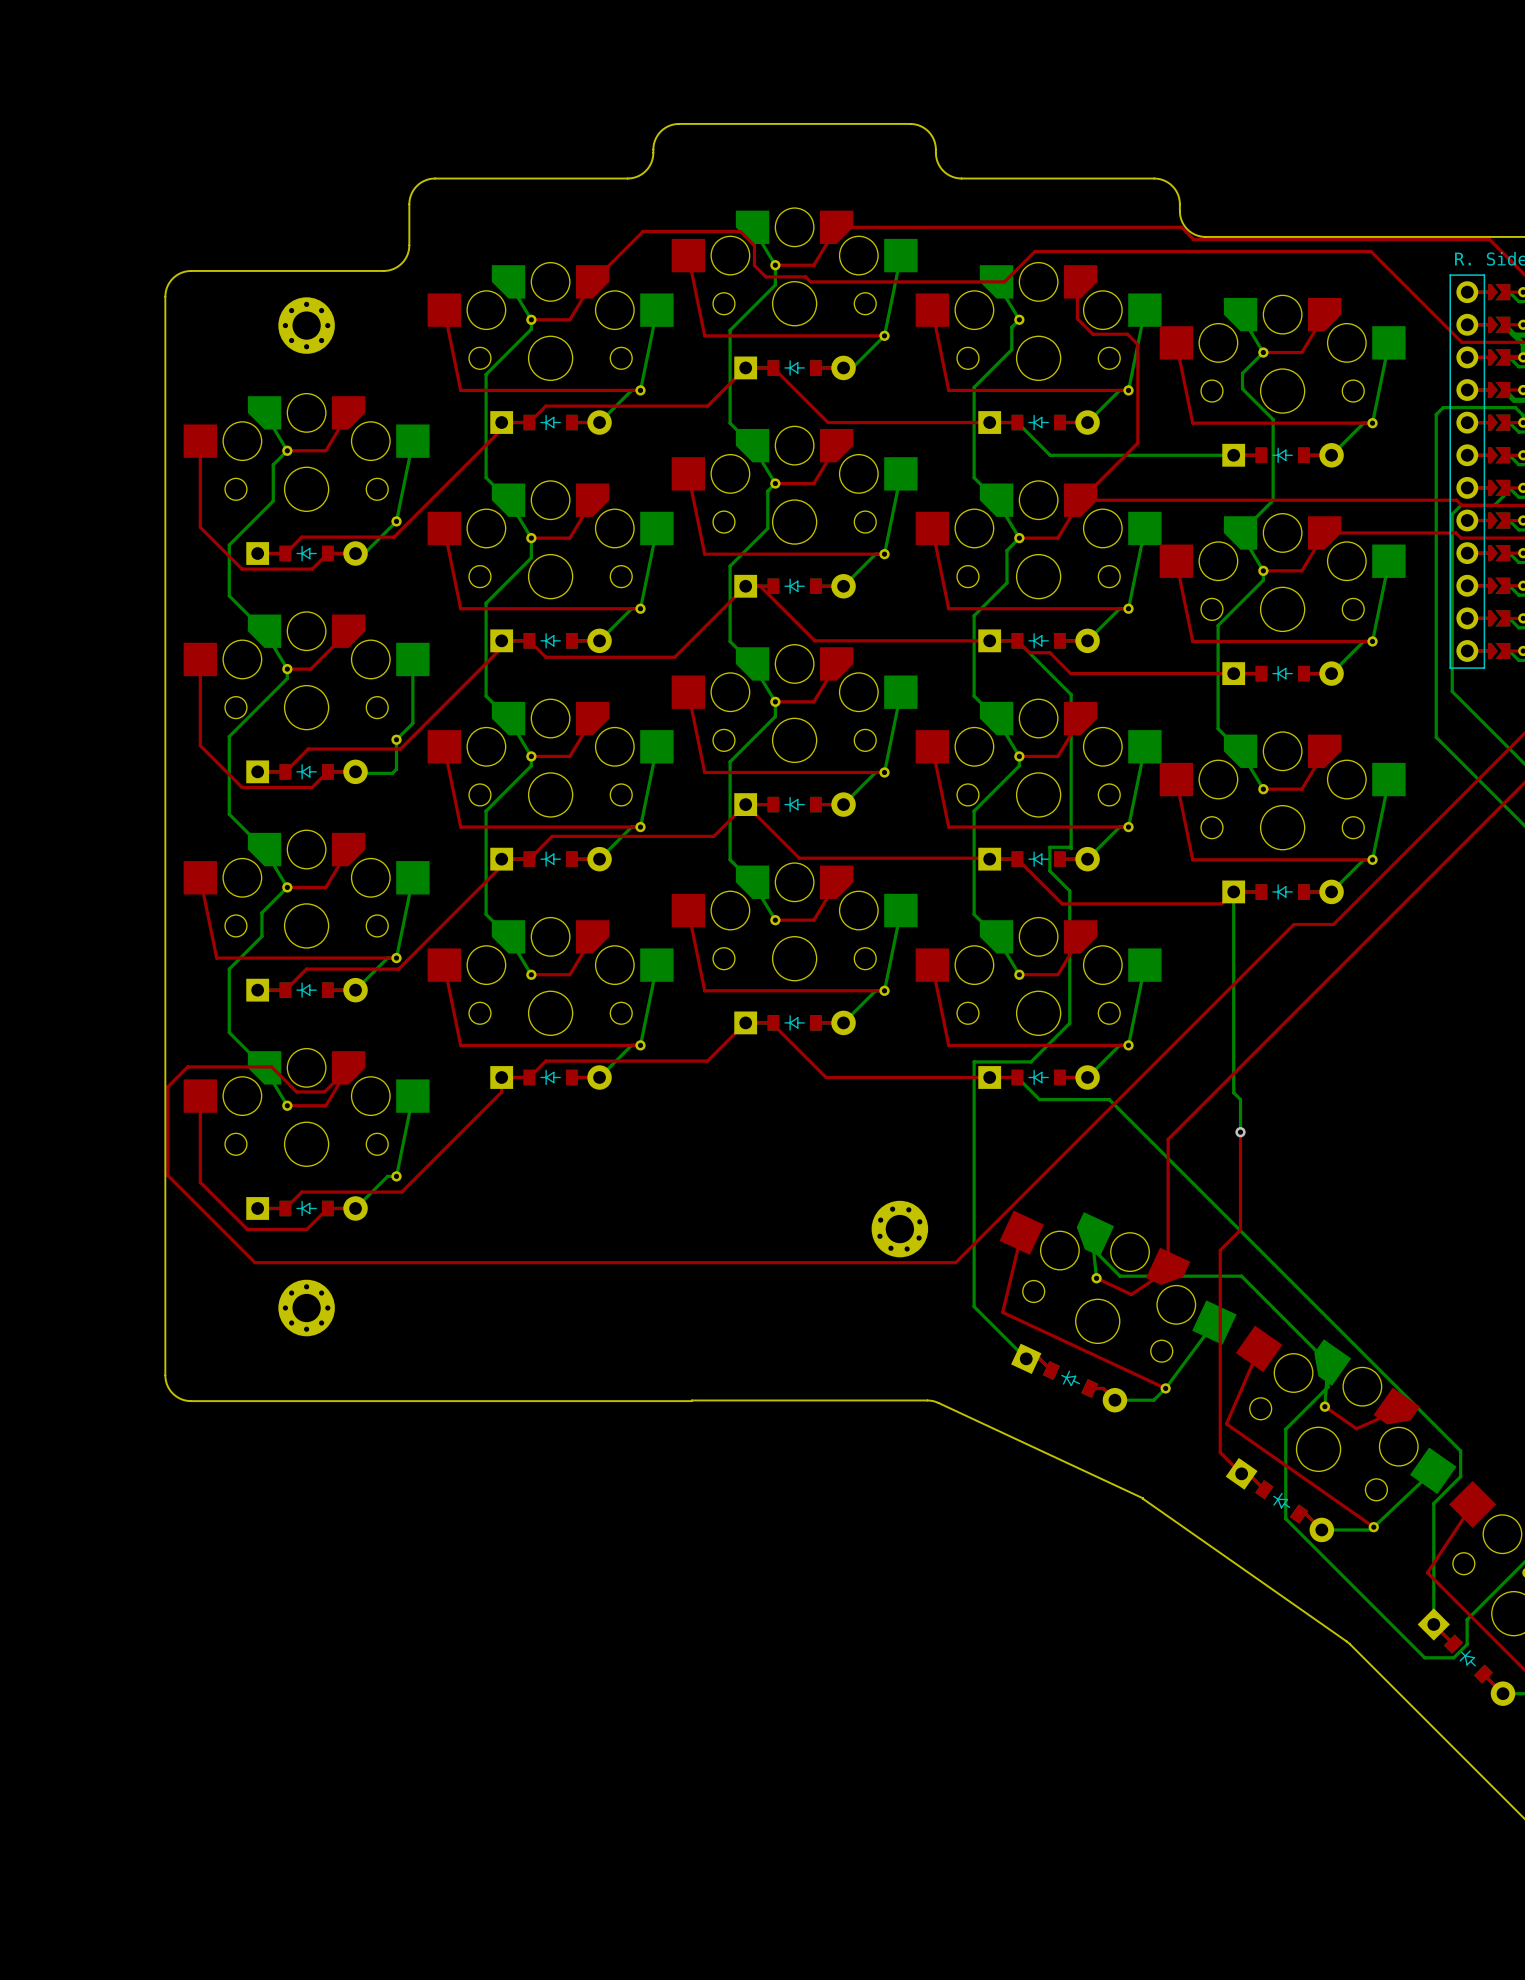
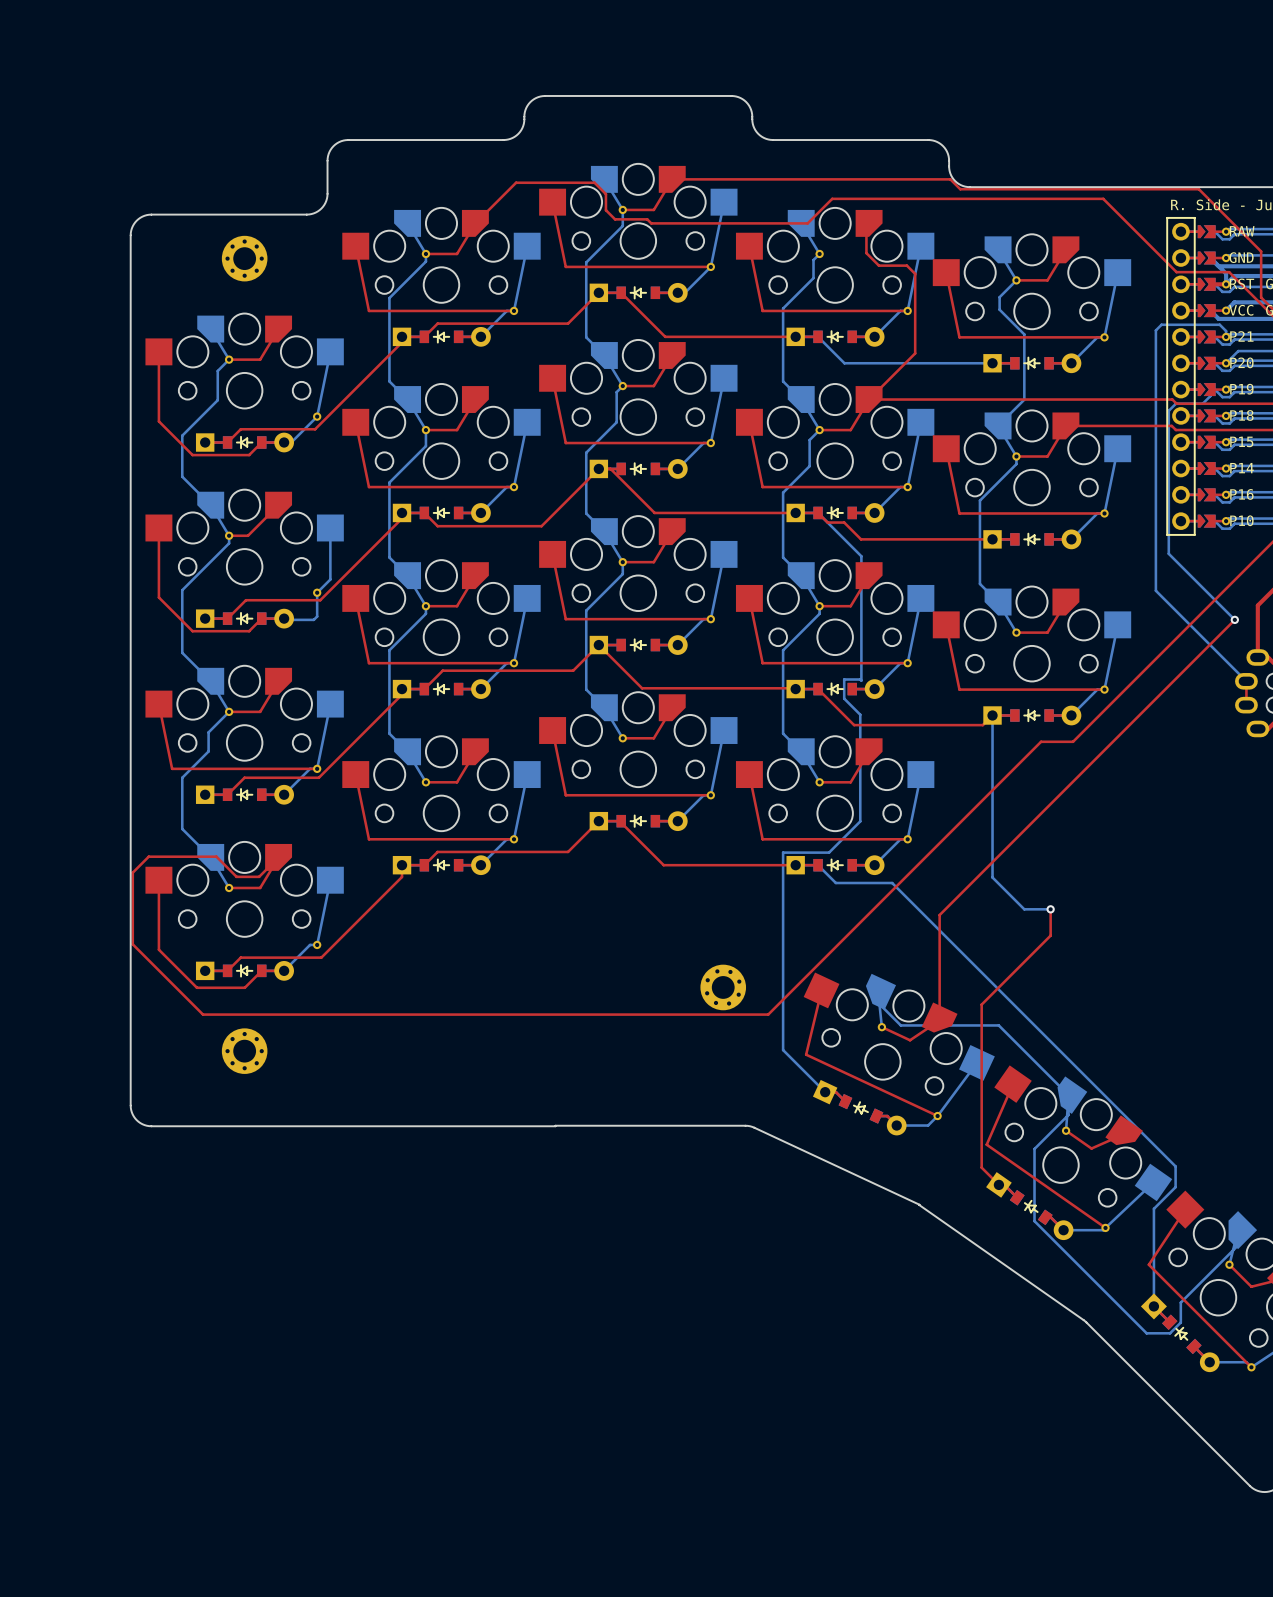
bottom track: (1240, 1099) (1240, 1132) -> (998, 883) (1024, 909) (1050, 909)
top track: (1240, 1132) (1240, 1230) -> (1050, 909) (1050, 935) (998, 988)
via position: (1240, 1132) -> (1050, 909)

